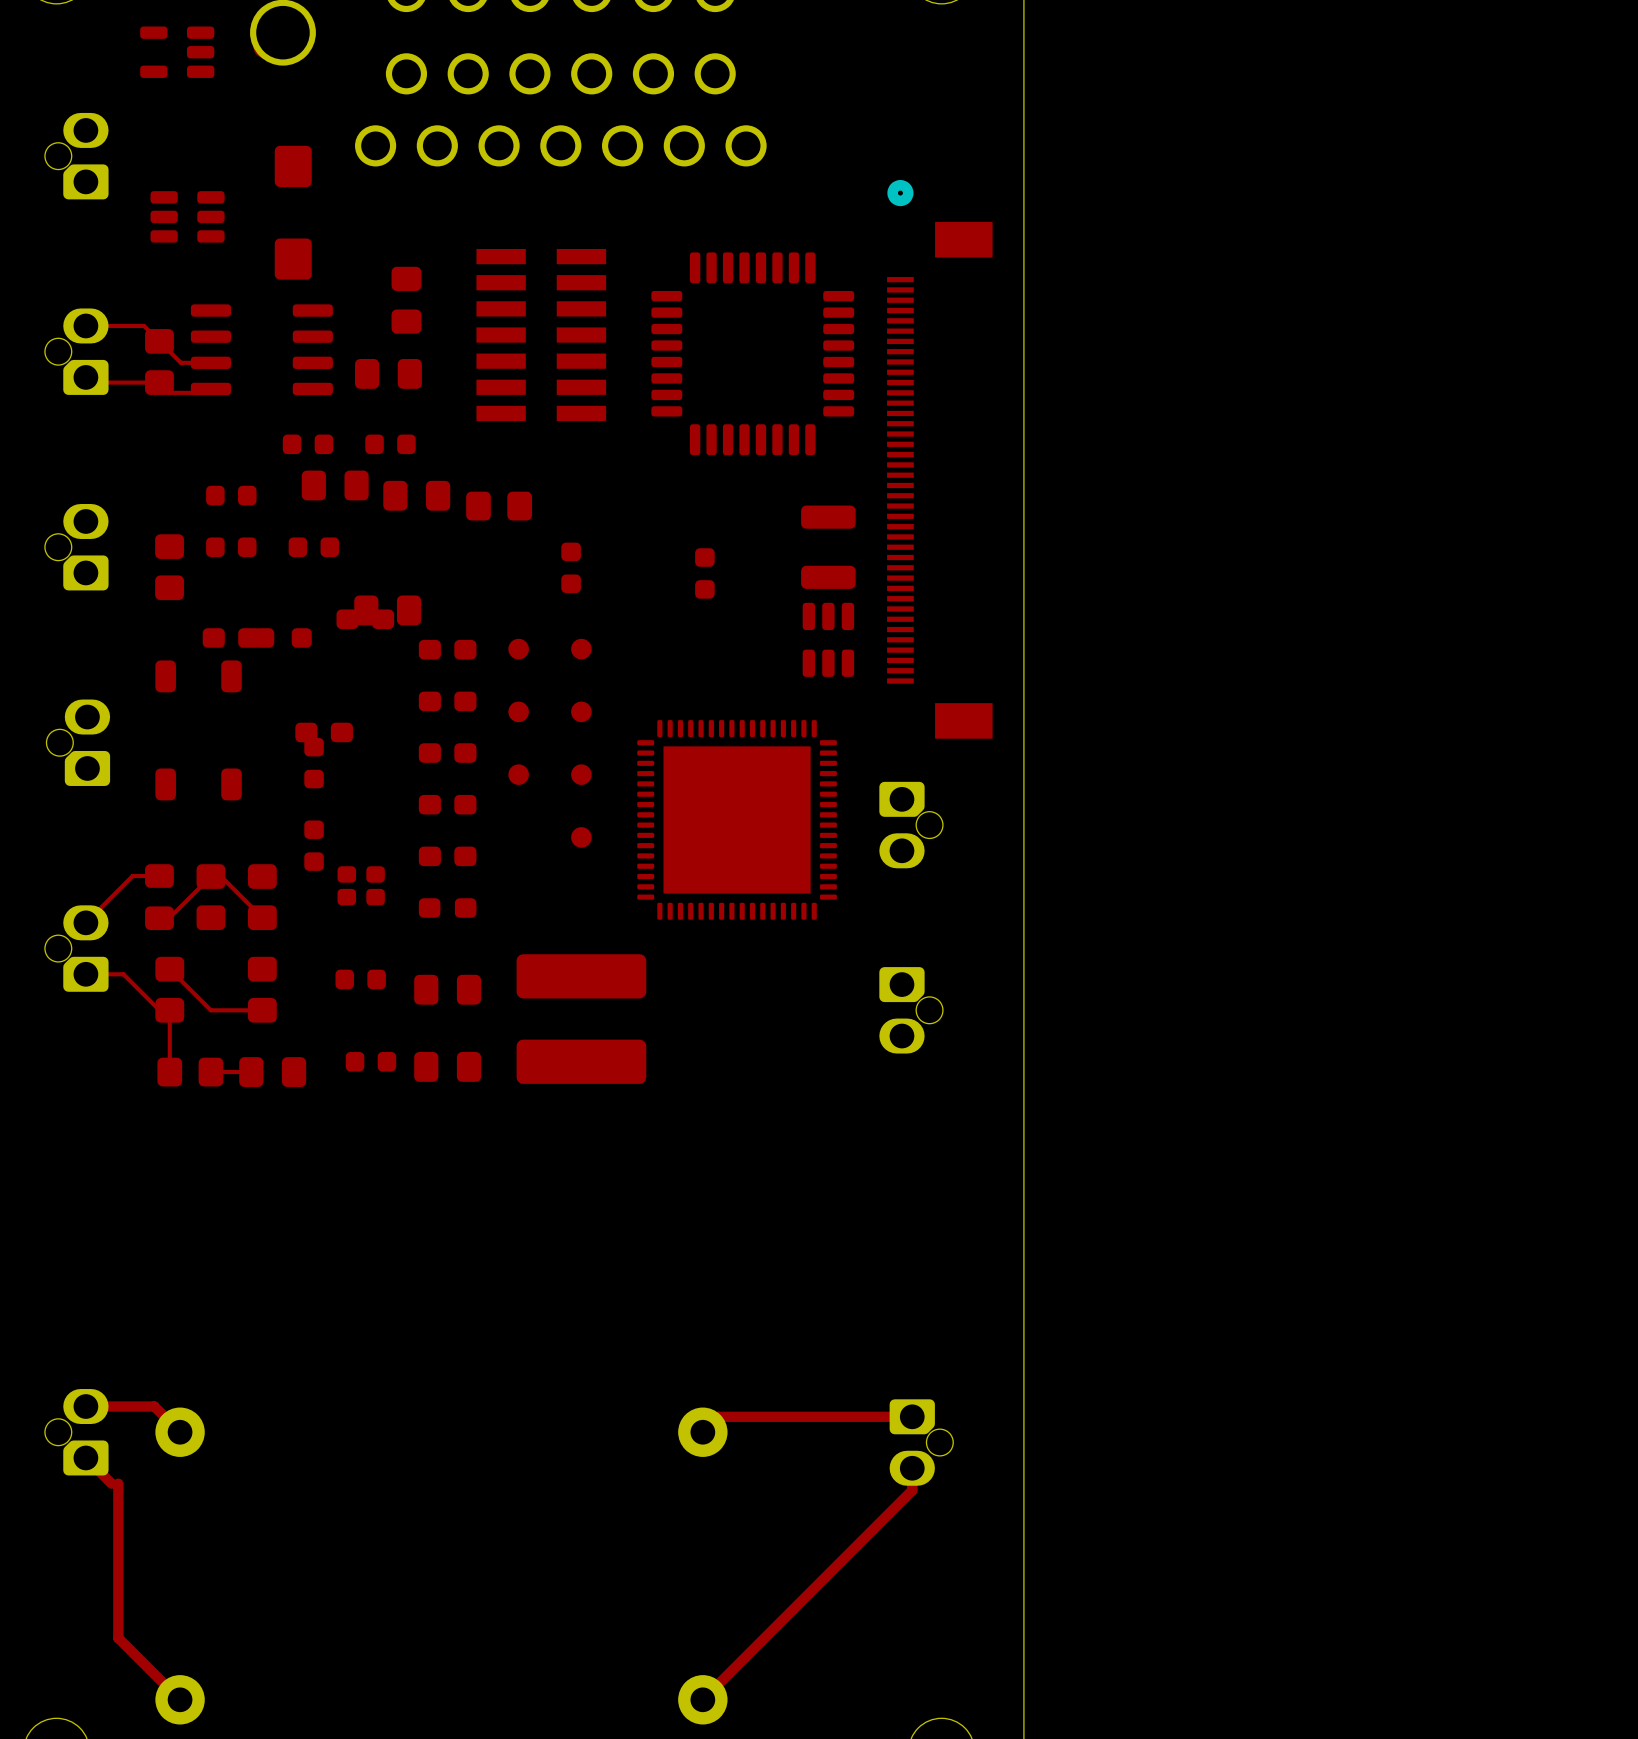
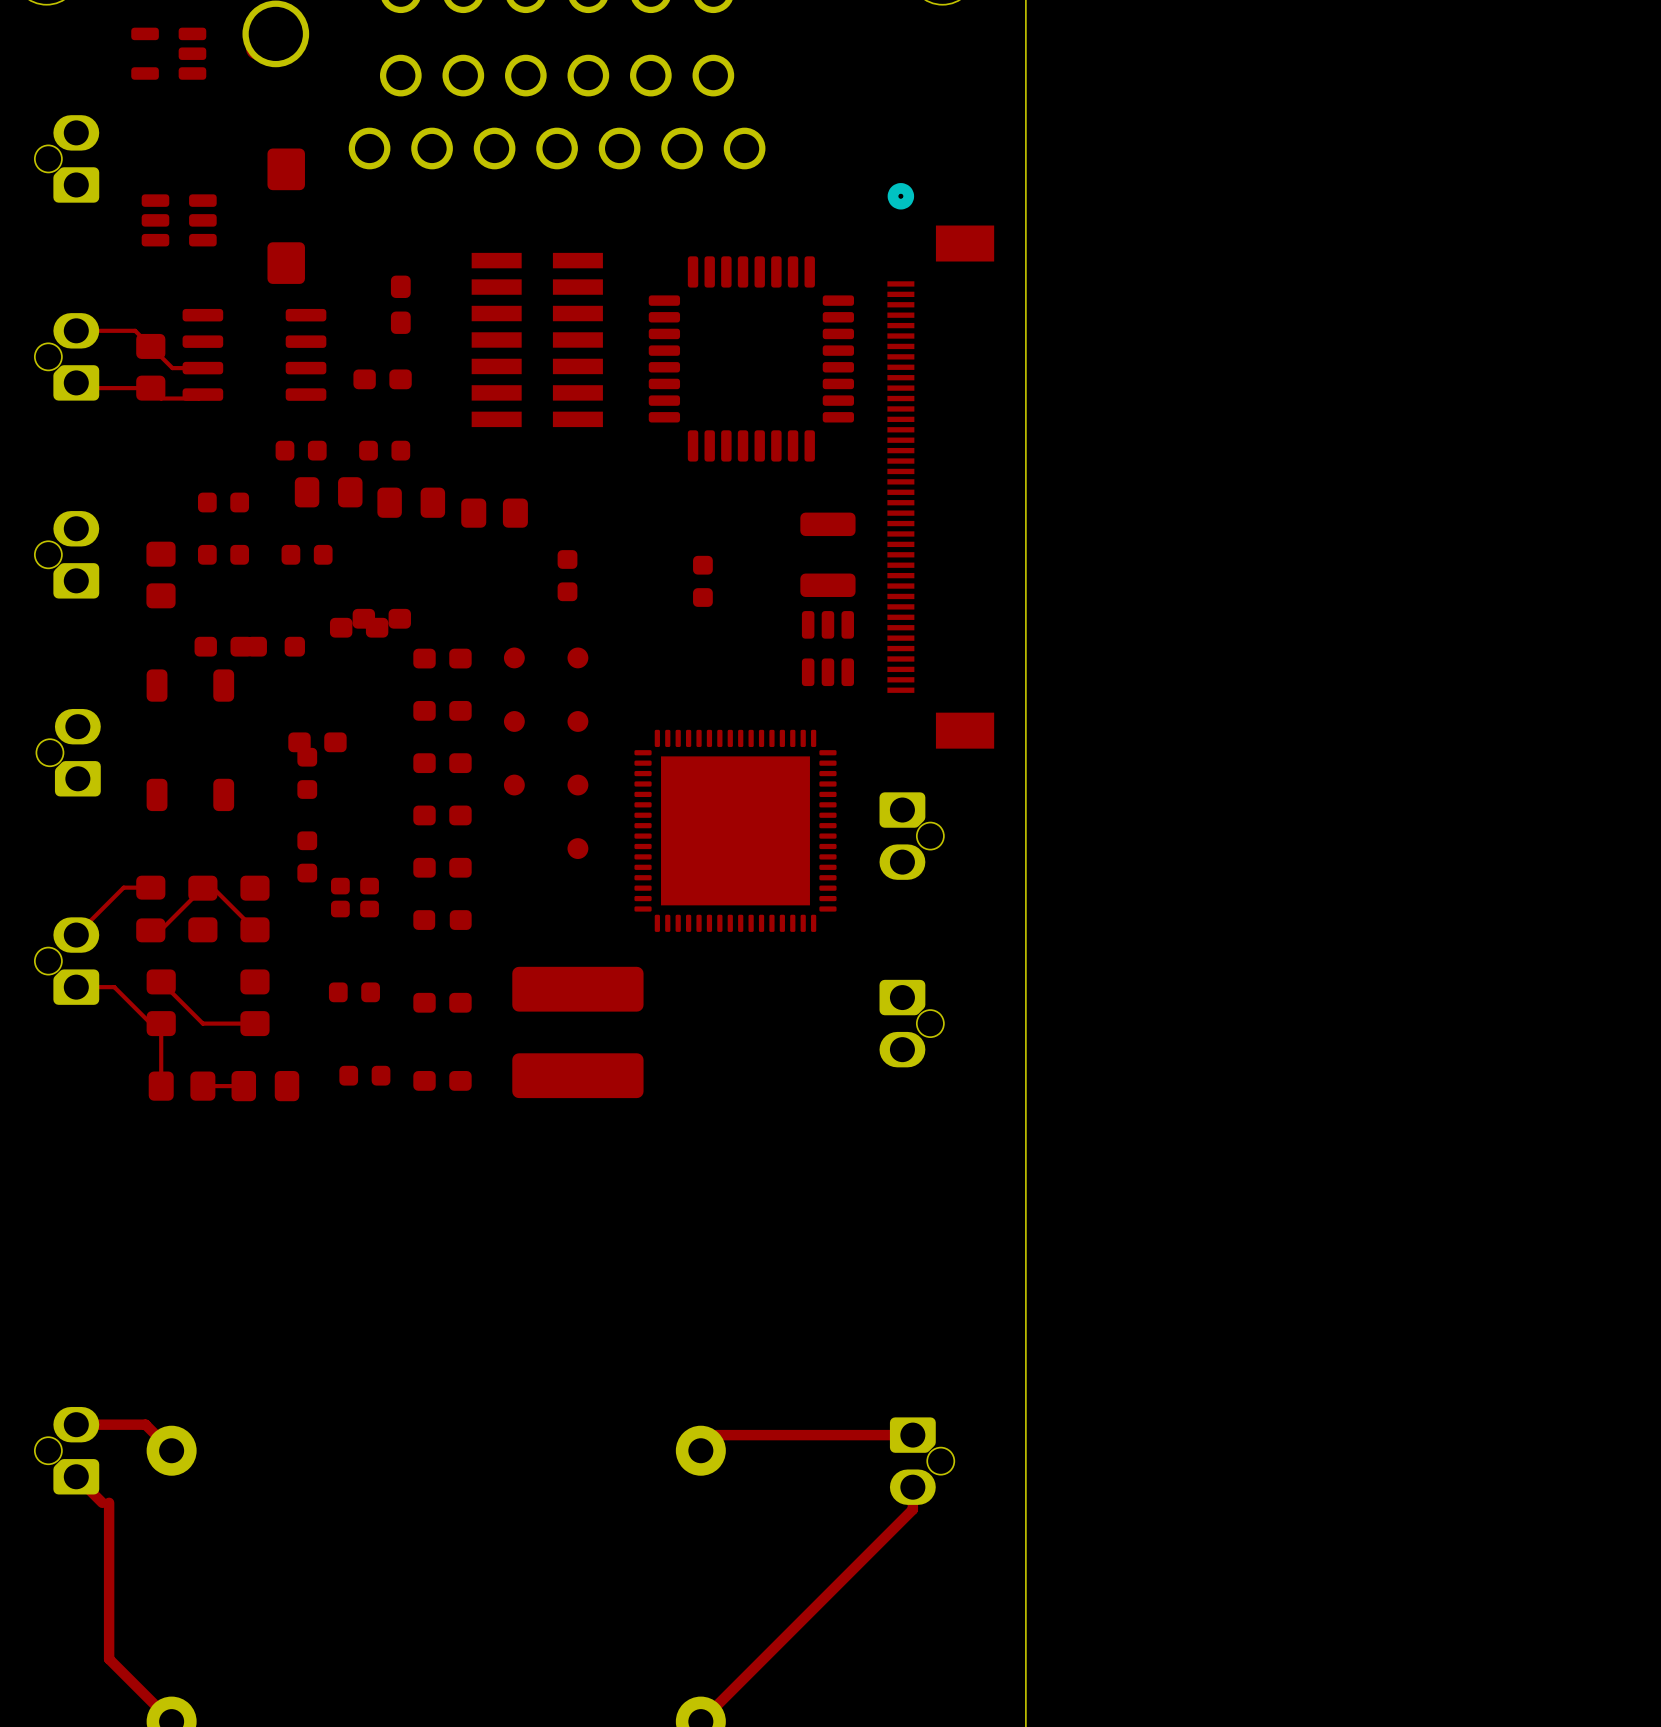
part footprint: [391, 266, 422, 334] -> [390, 275, 411, 334]
part footprint: [355, 359, 422, 389] -> [353, 369, 412, 390]
part footprint: [354, 595, 422, 626] -> [352, 608, 411, 629]
part footprint: [414, 974, 482, 1005] -> [413, 992, 472, 1013]
part footprint: [414, 1051, 482, 1082] -> [413, 1071, 472, 1091]

